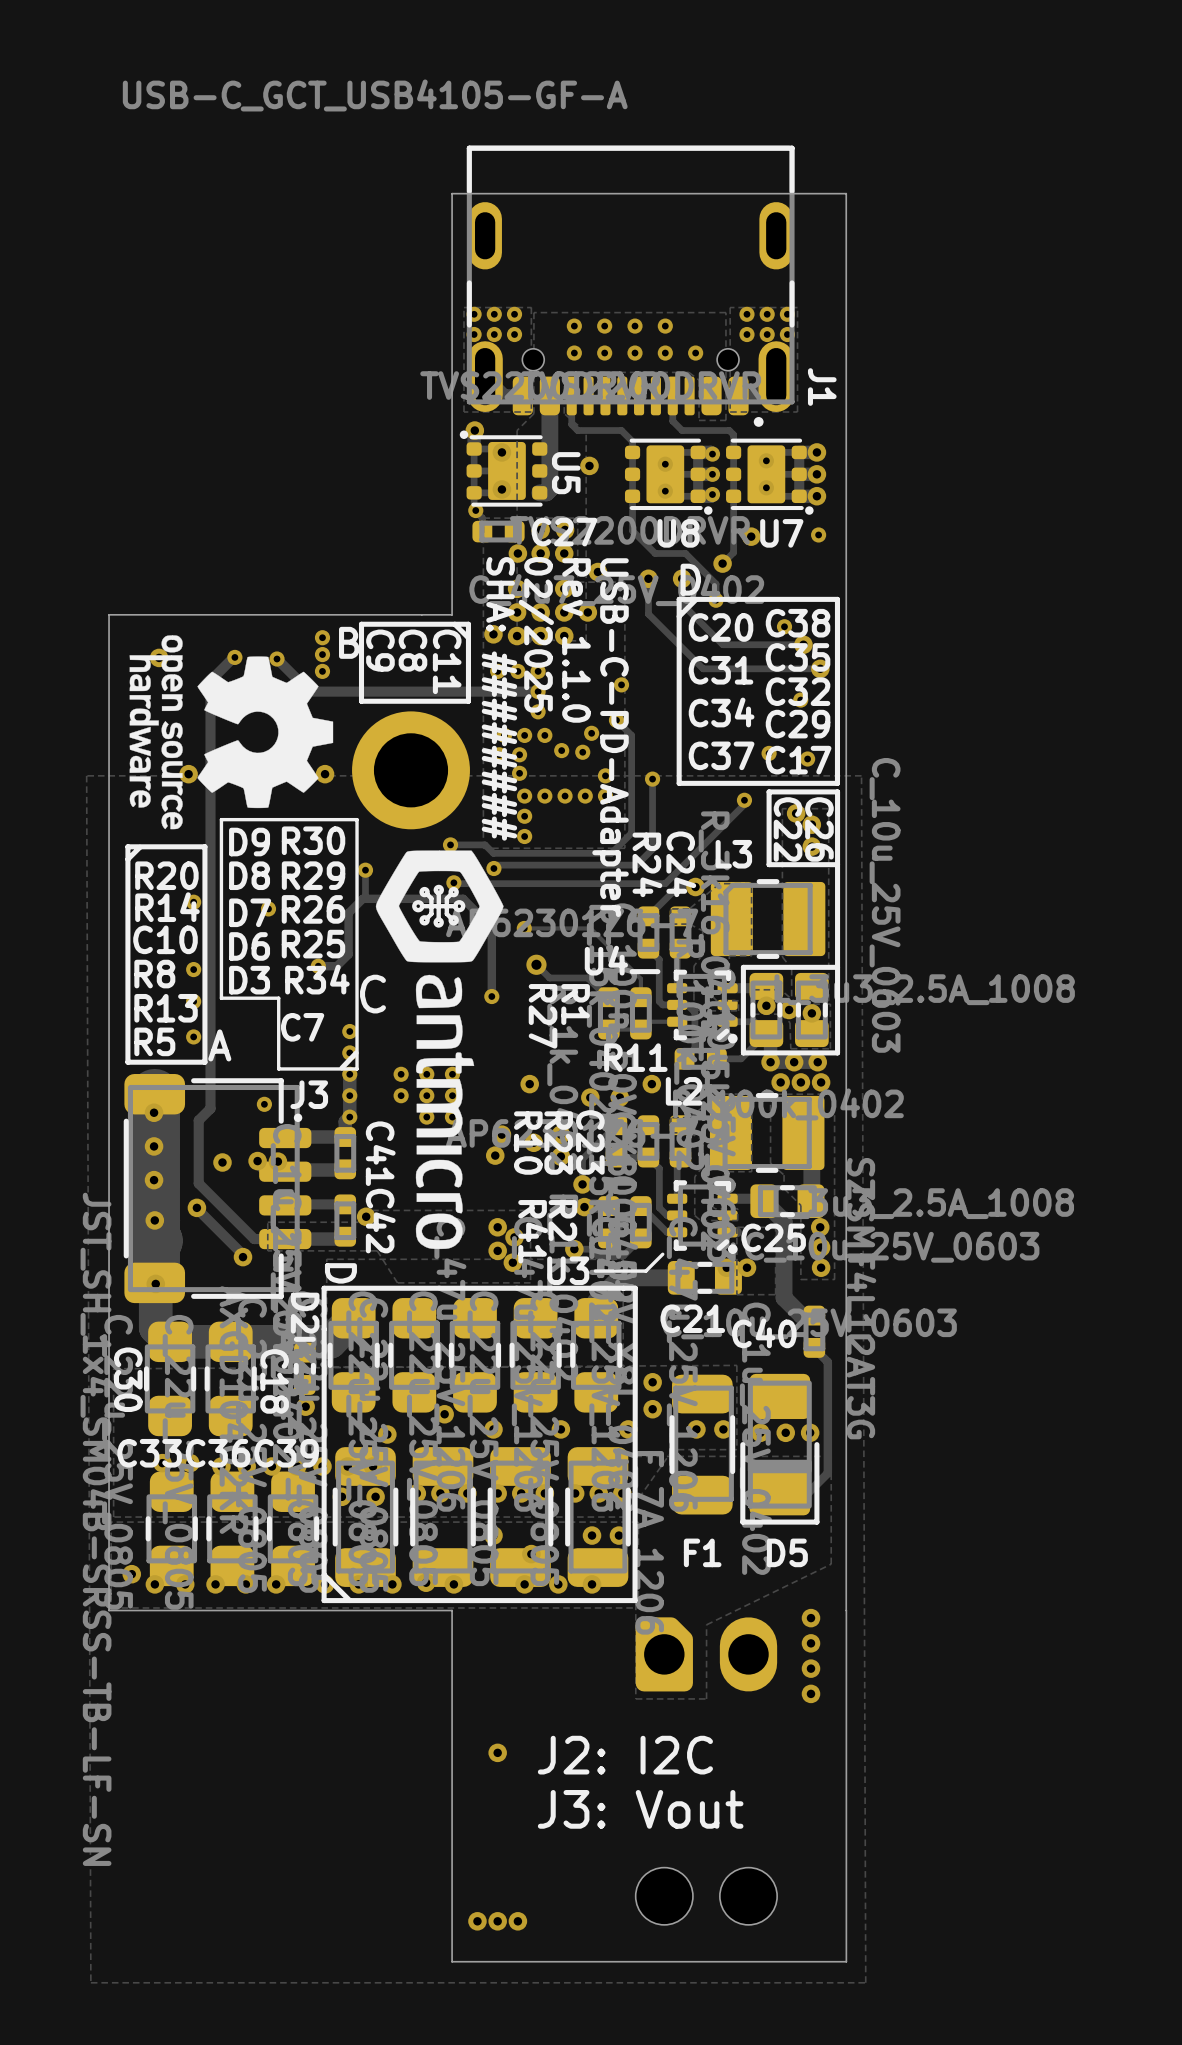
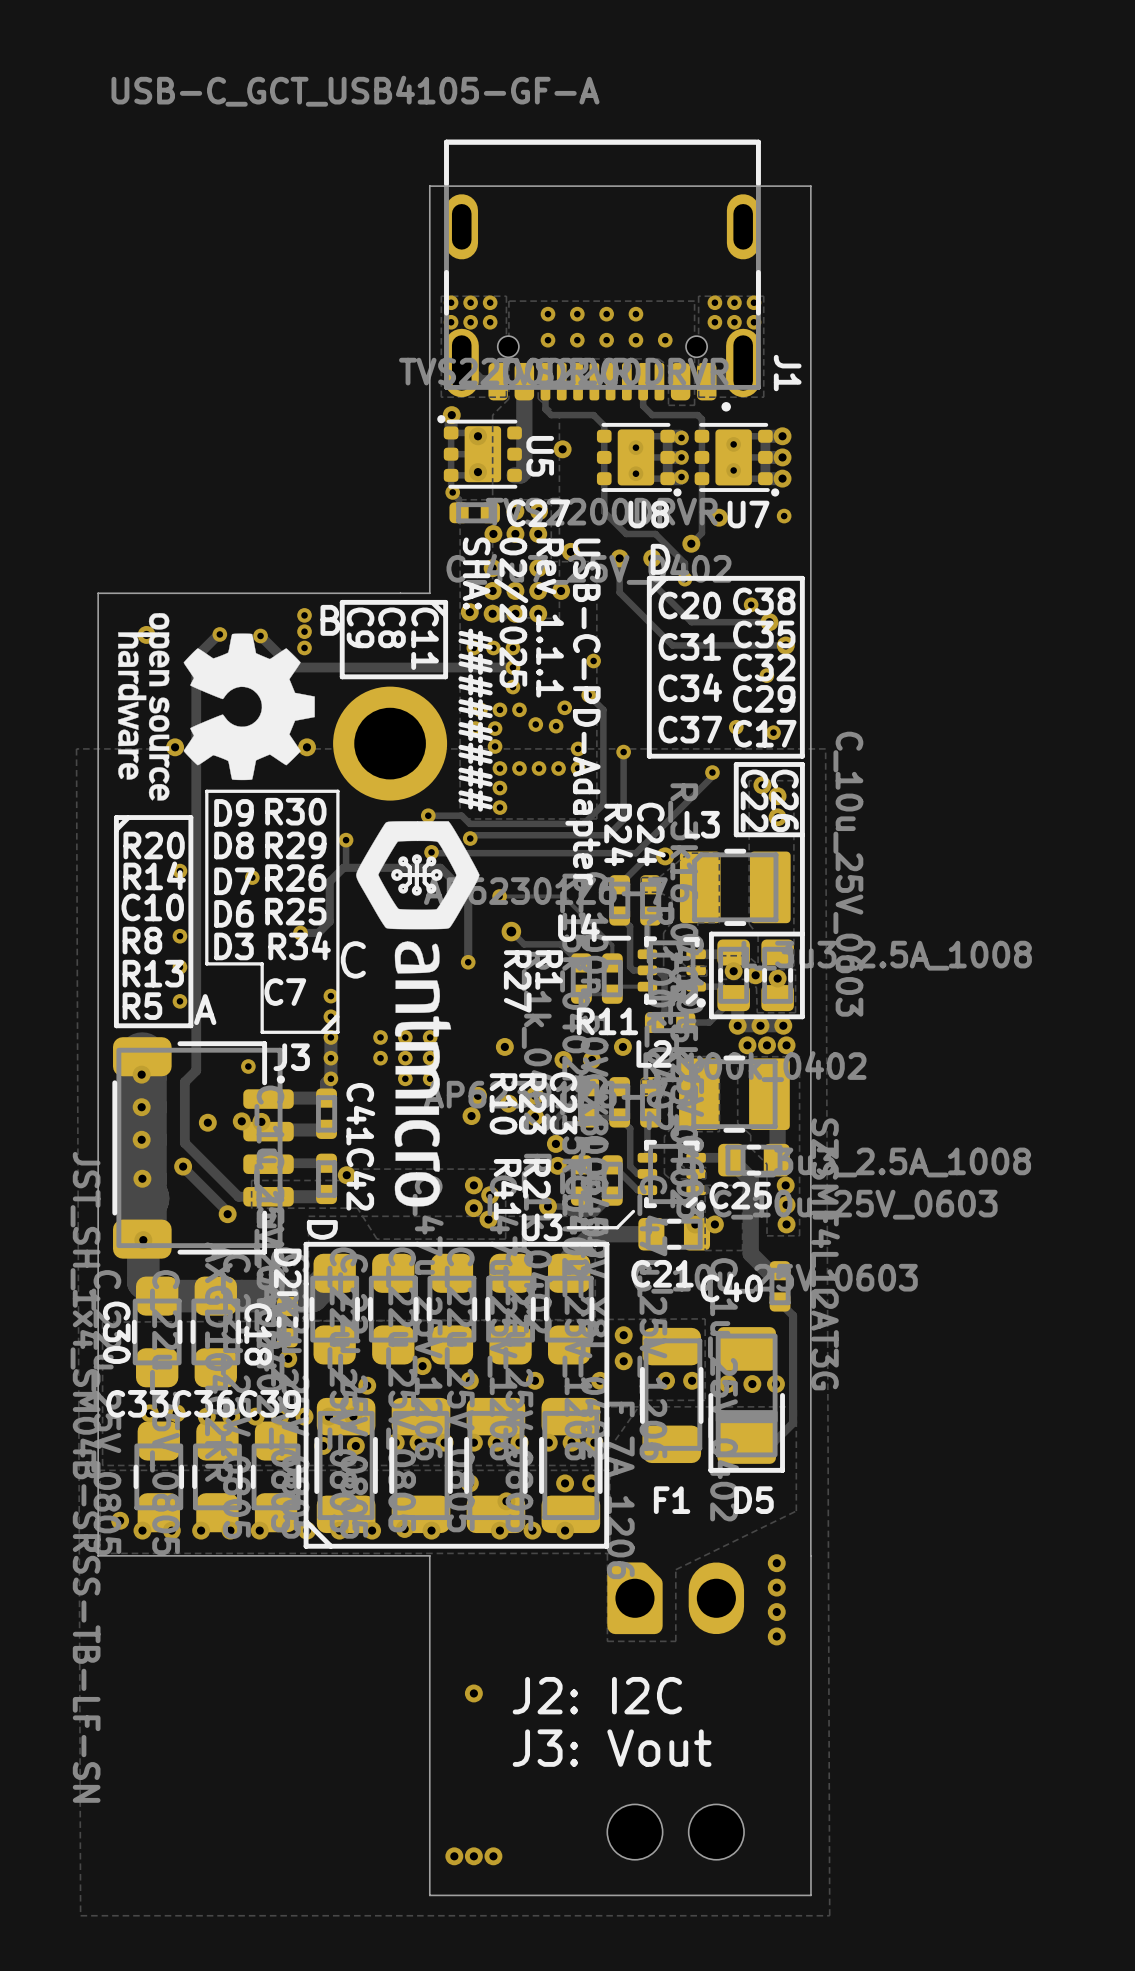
text: Rev 1.1.0 (576, 640) -> Rev 1.1.1 (550, 618)

